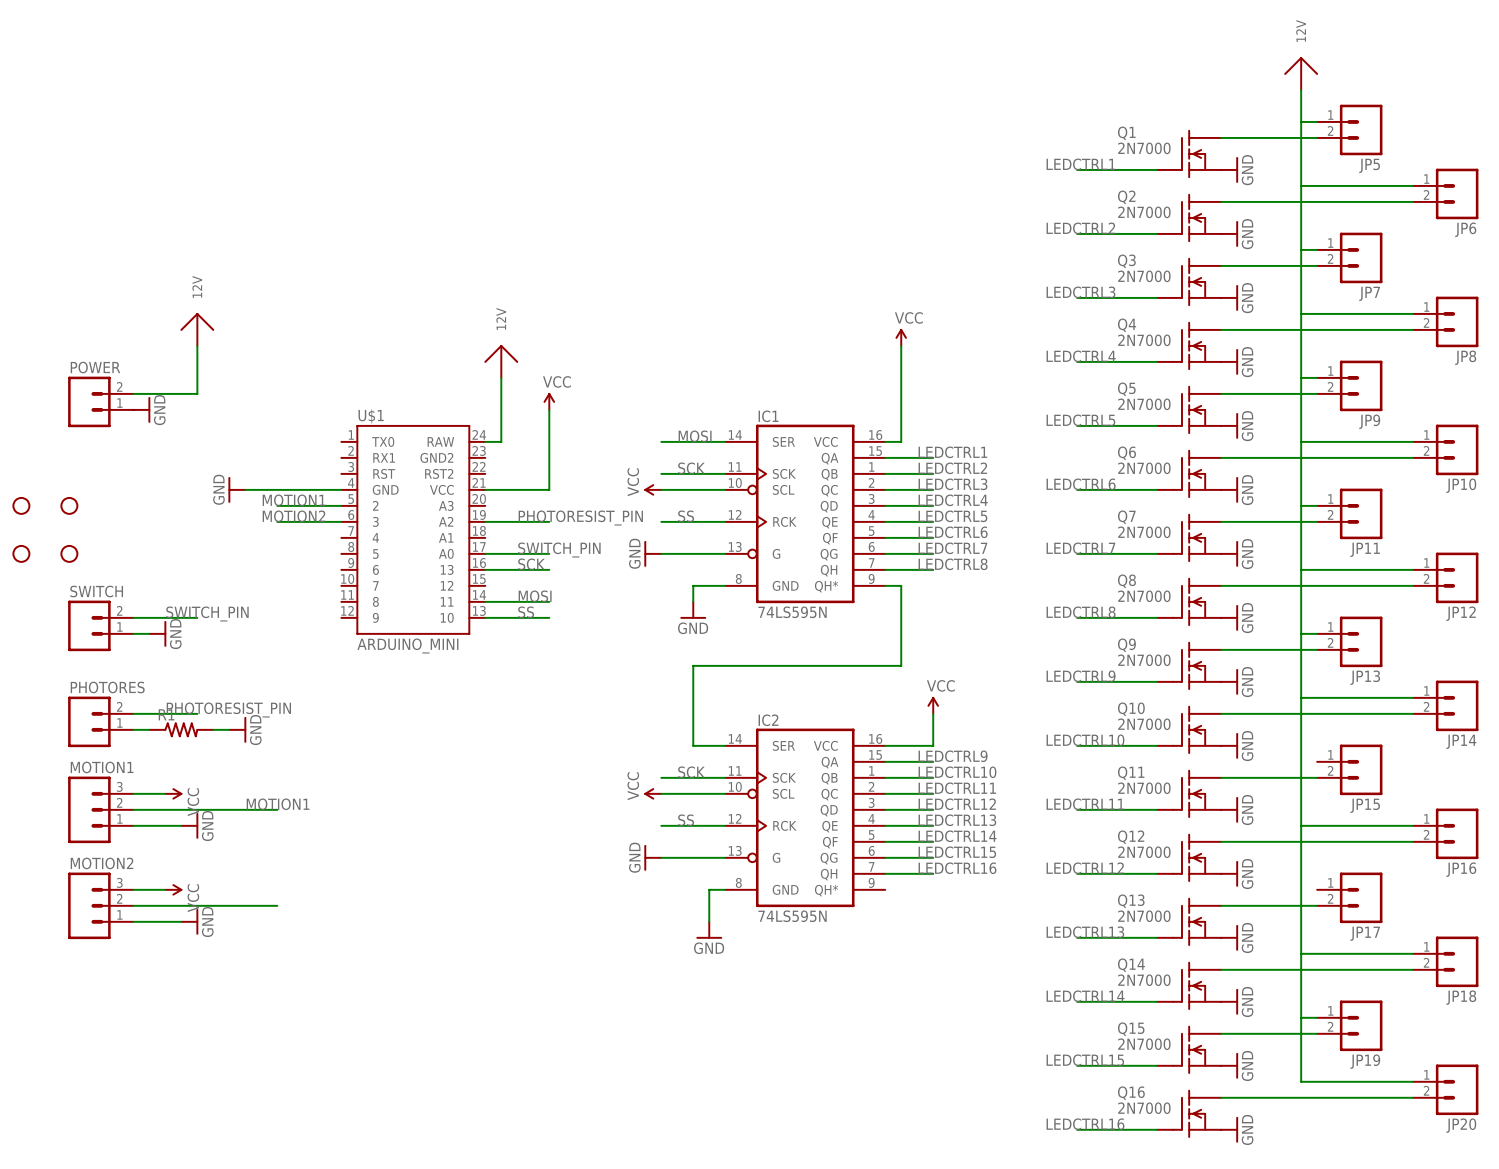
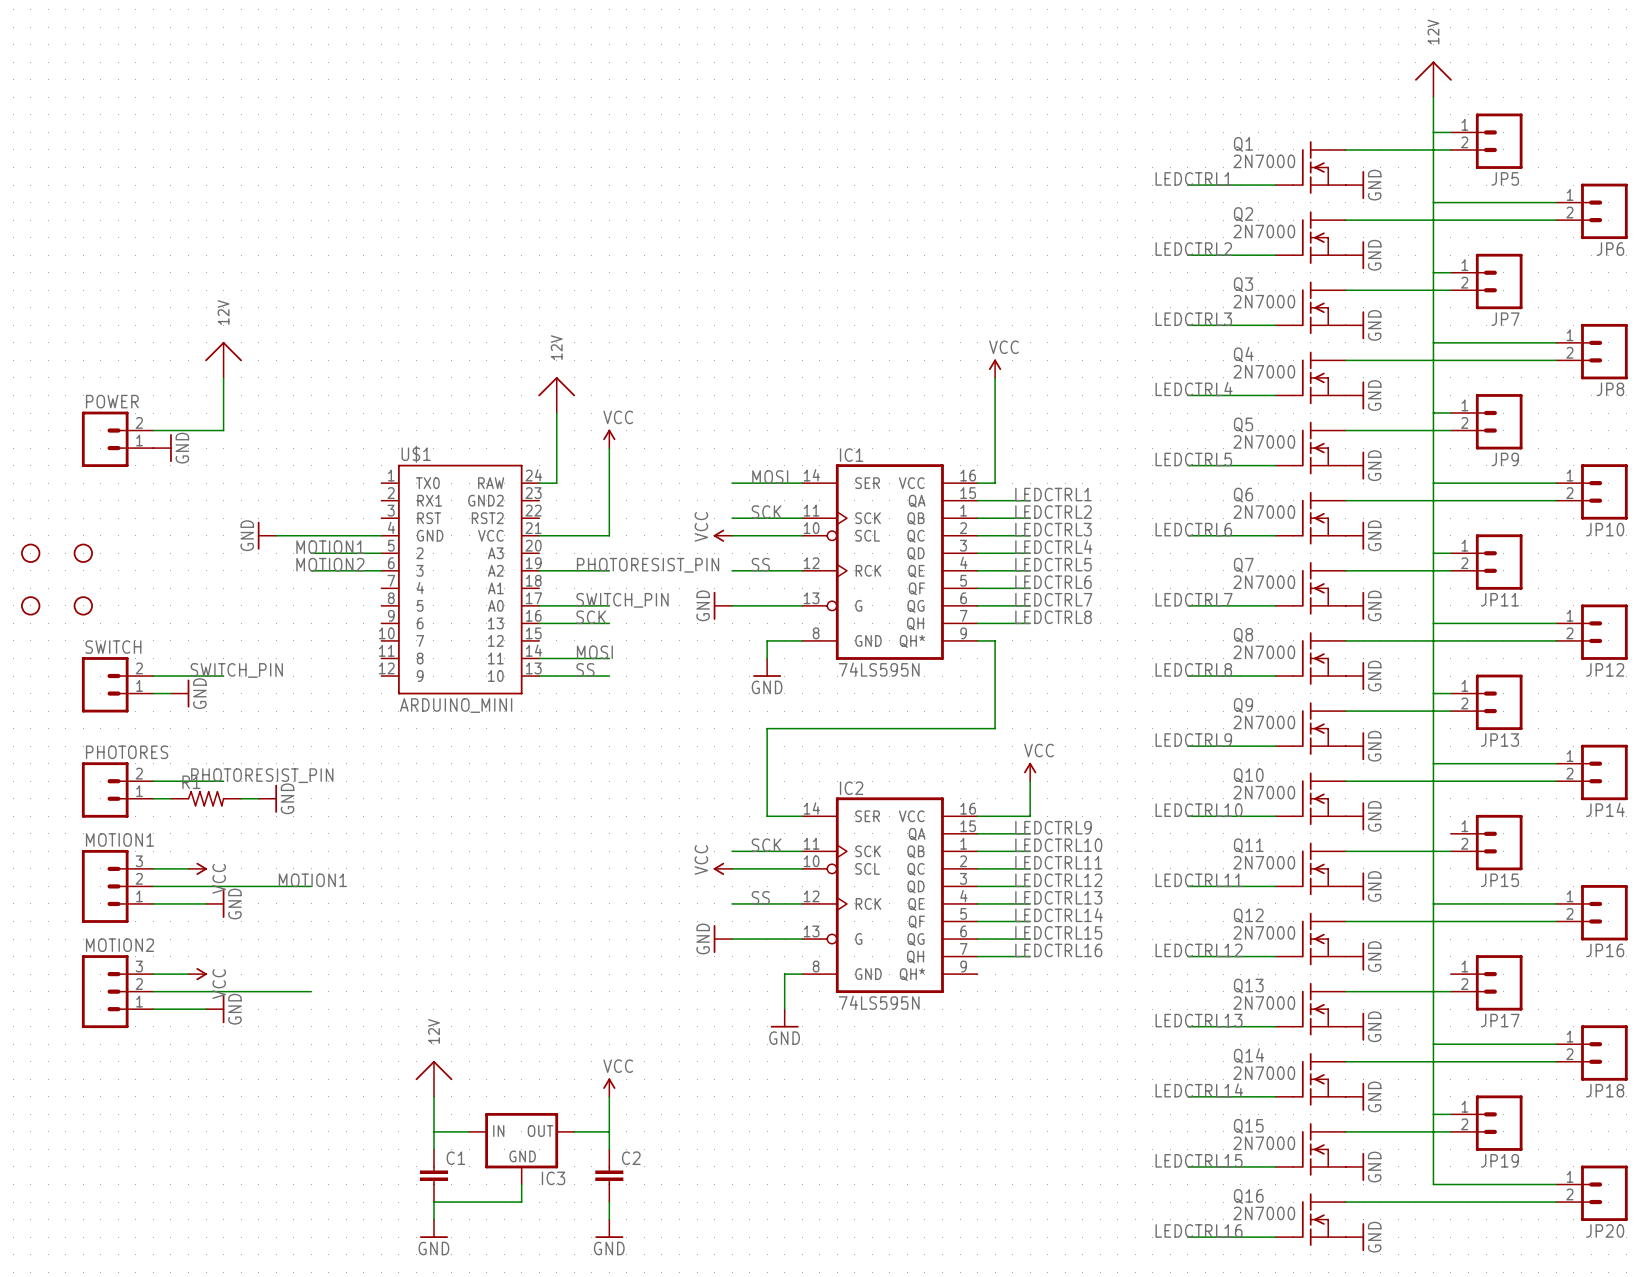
power symbol: none -> (433, 1078)
power symbol: none -> VCC (609, 1087)
wire: none -> (433, 1096) (433, 1149)
wire: none -> (609, 1096) (609, 1149)
wire: none -> (433, 1131) (469, 1131)
wire: none -> (574, 1131) (609, 1131)
IC3: none -> (521, 1148)
C1: none -> (433, 1175)
C2: none -> (609, 1175)
wire: none -> (521, 1184) (521, 1202) (433, 1202) (433, 1219)
wire: none -> (609, 1202) (609, 1219)
power symbol: none -> GND (433, 1228)
power symbol: none -> GND (609, 1228)

